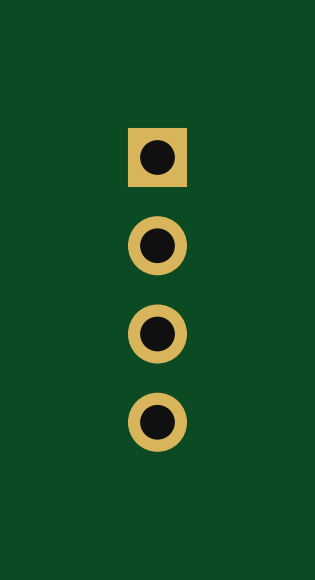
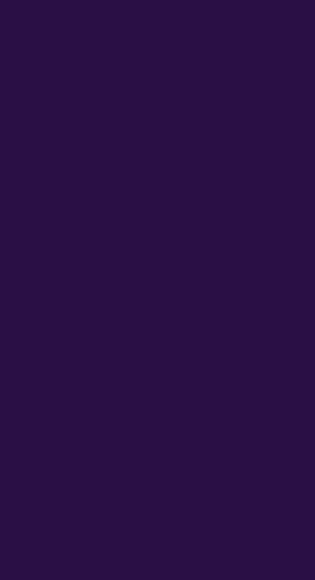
part: (157, 289) -> none

